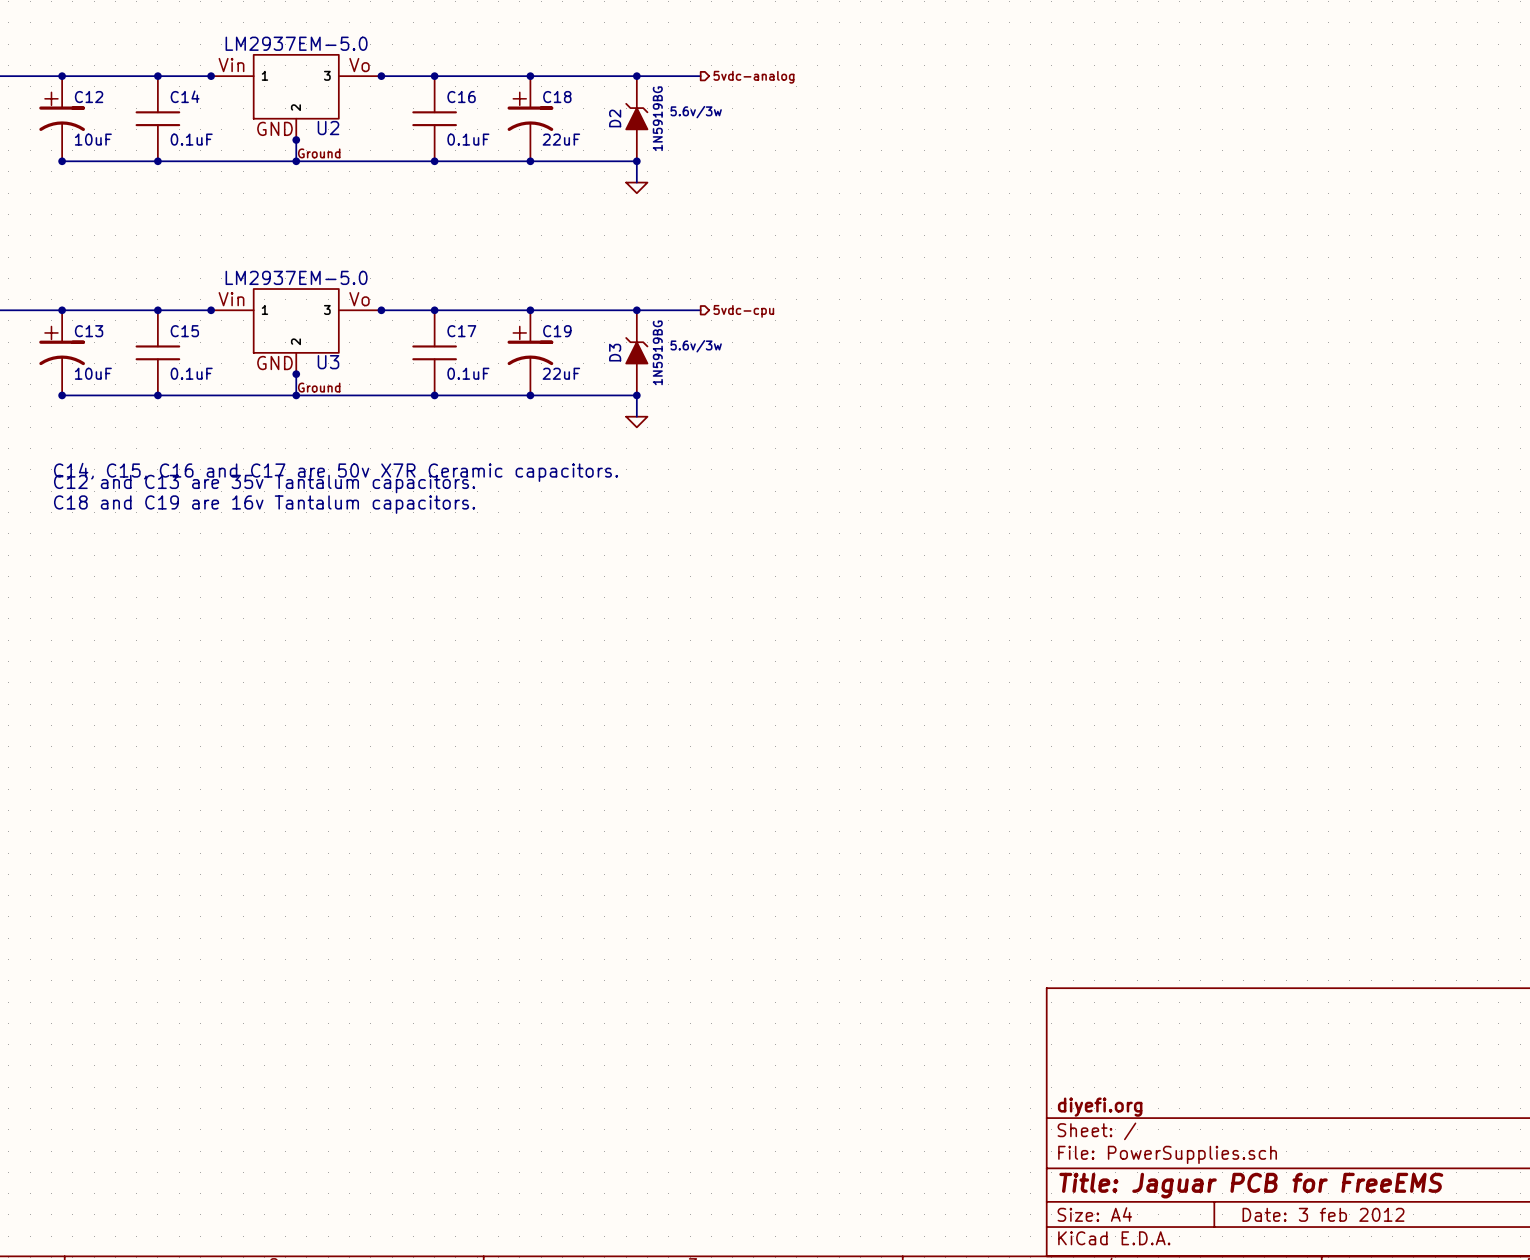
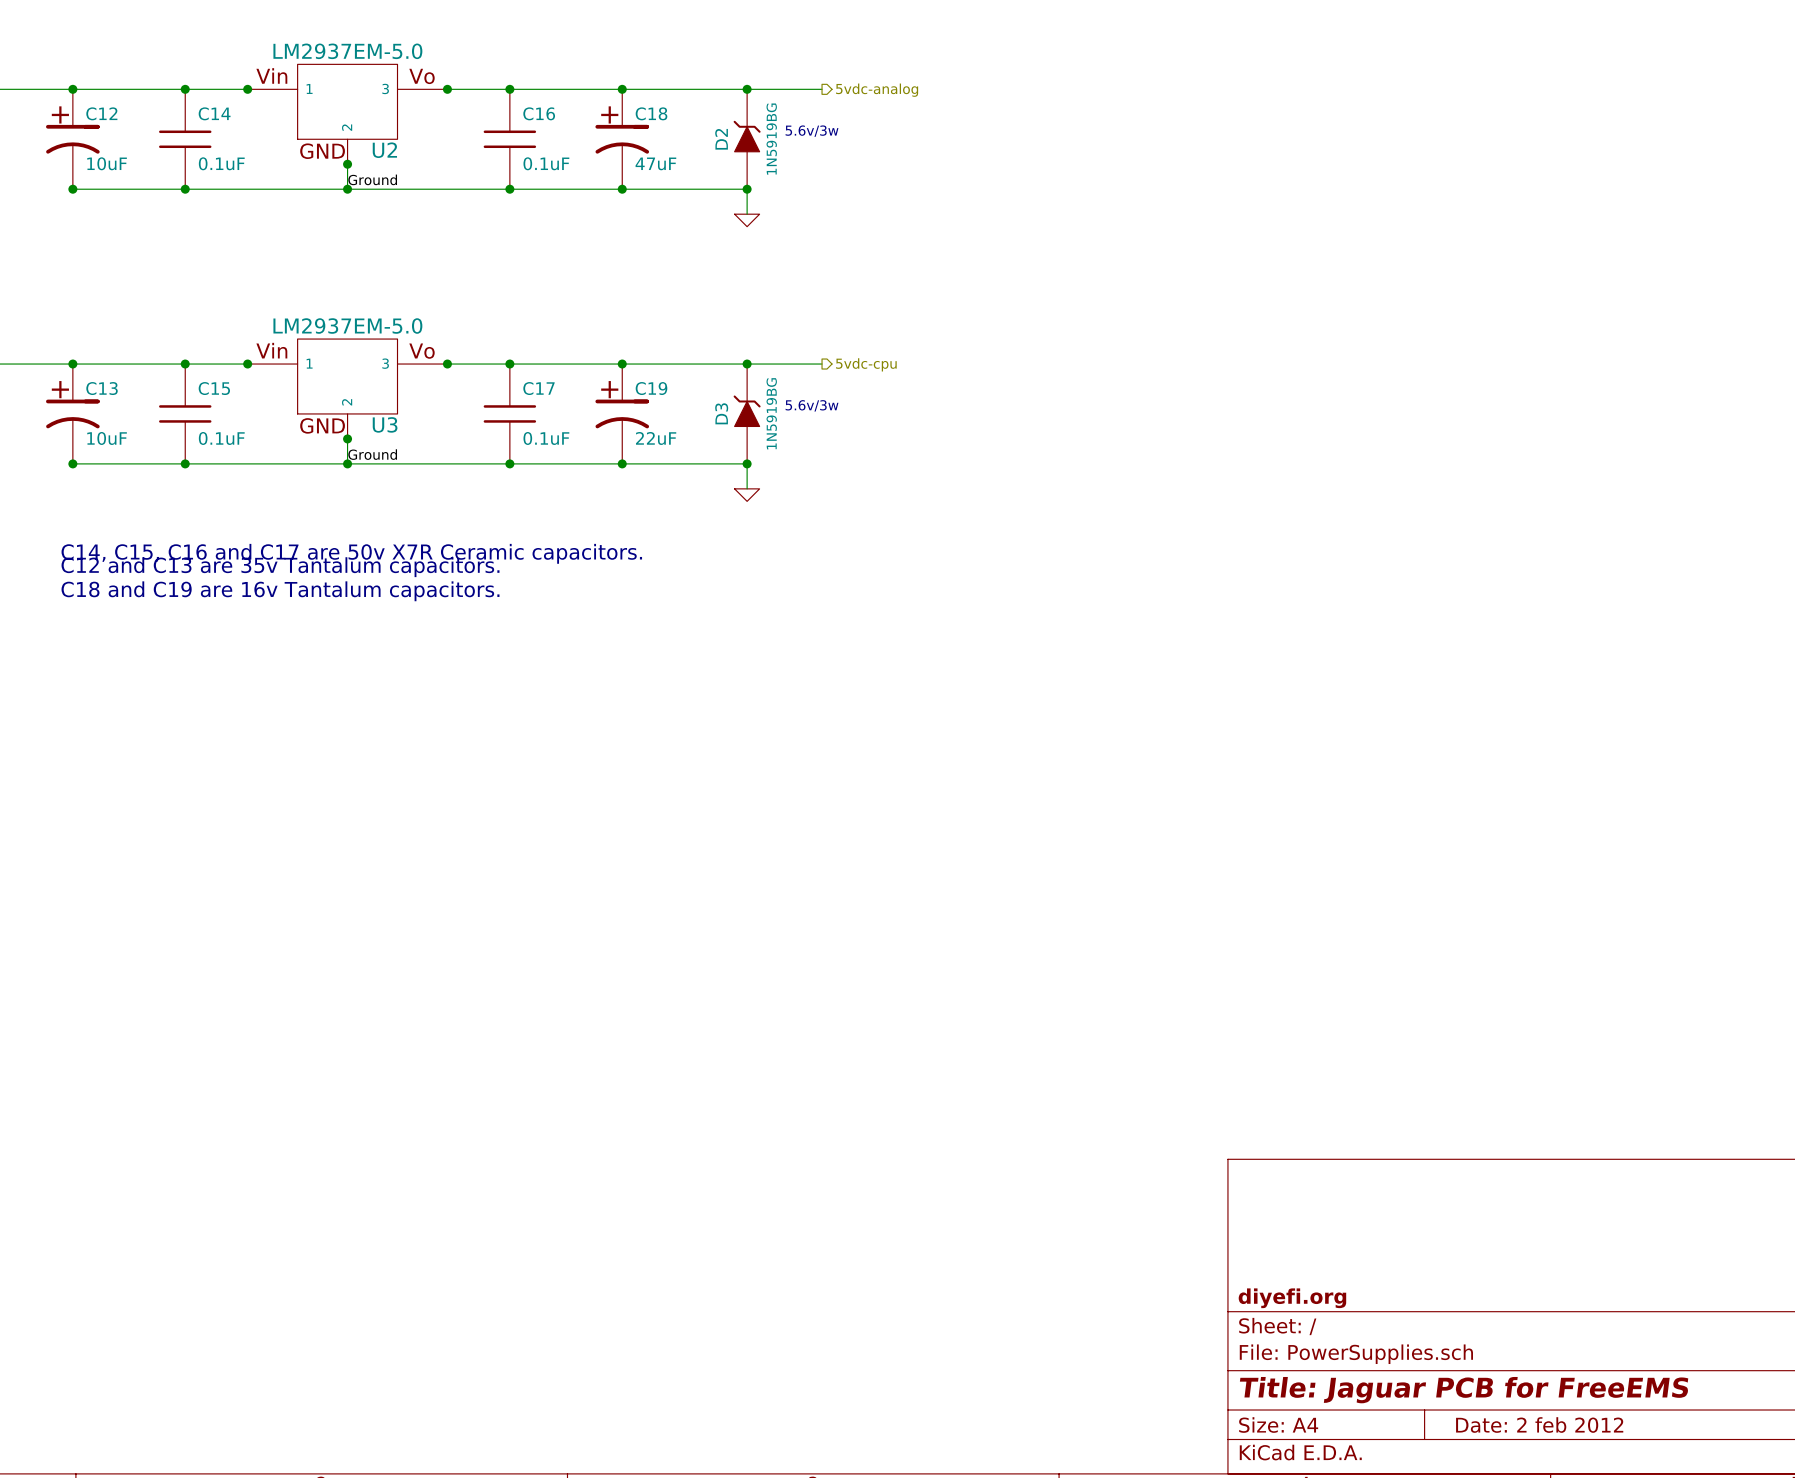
C18 value: 22uF (561, 139) -> 47uF (655, 163)
title block: Date: 3 feb 2012 (1323, 1214) -> Date: 2 feb 2012 (1539, 1425)

